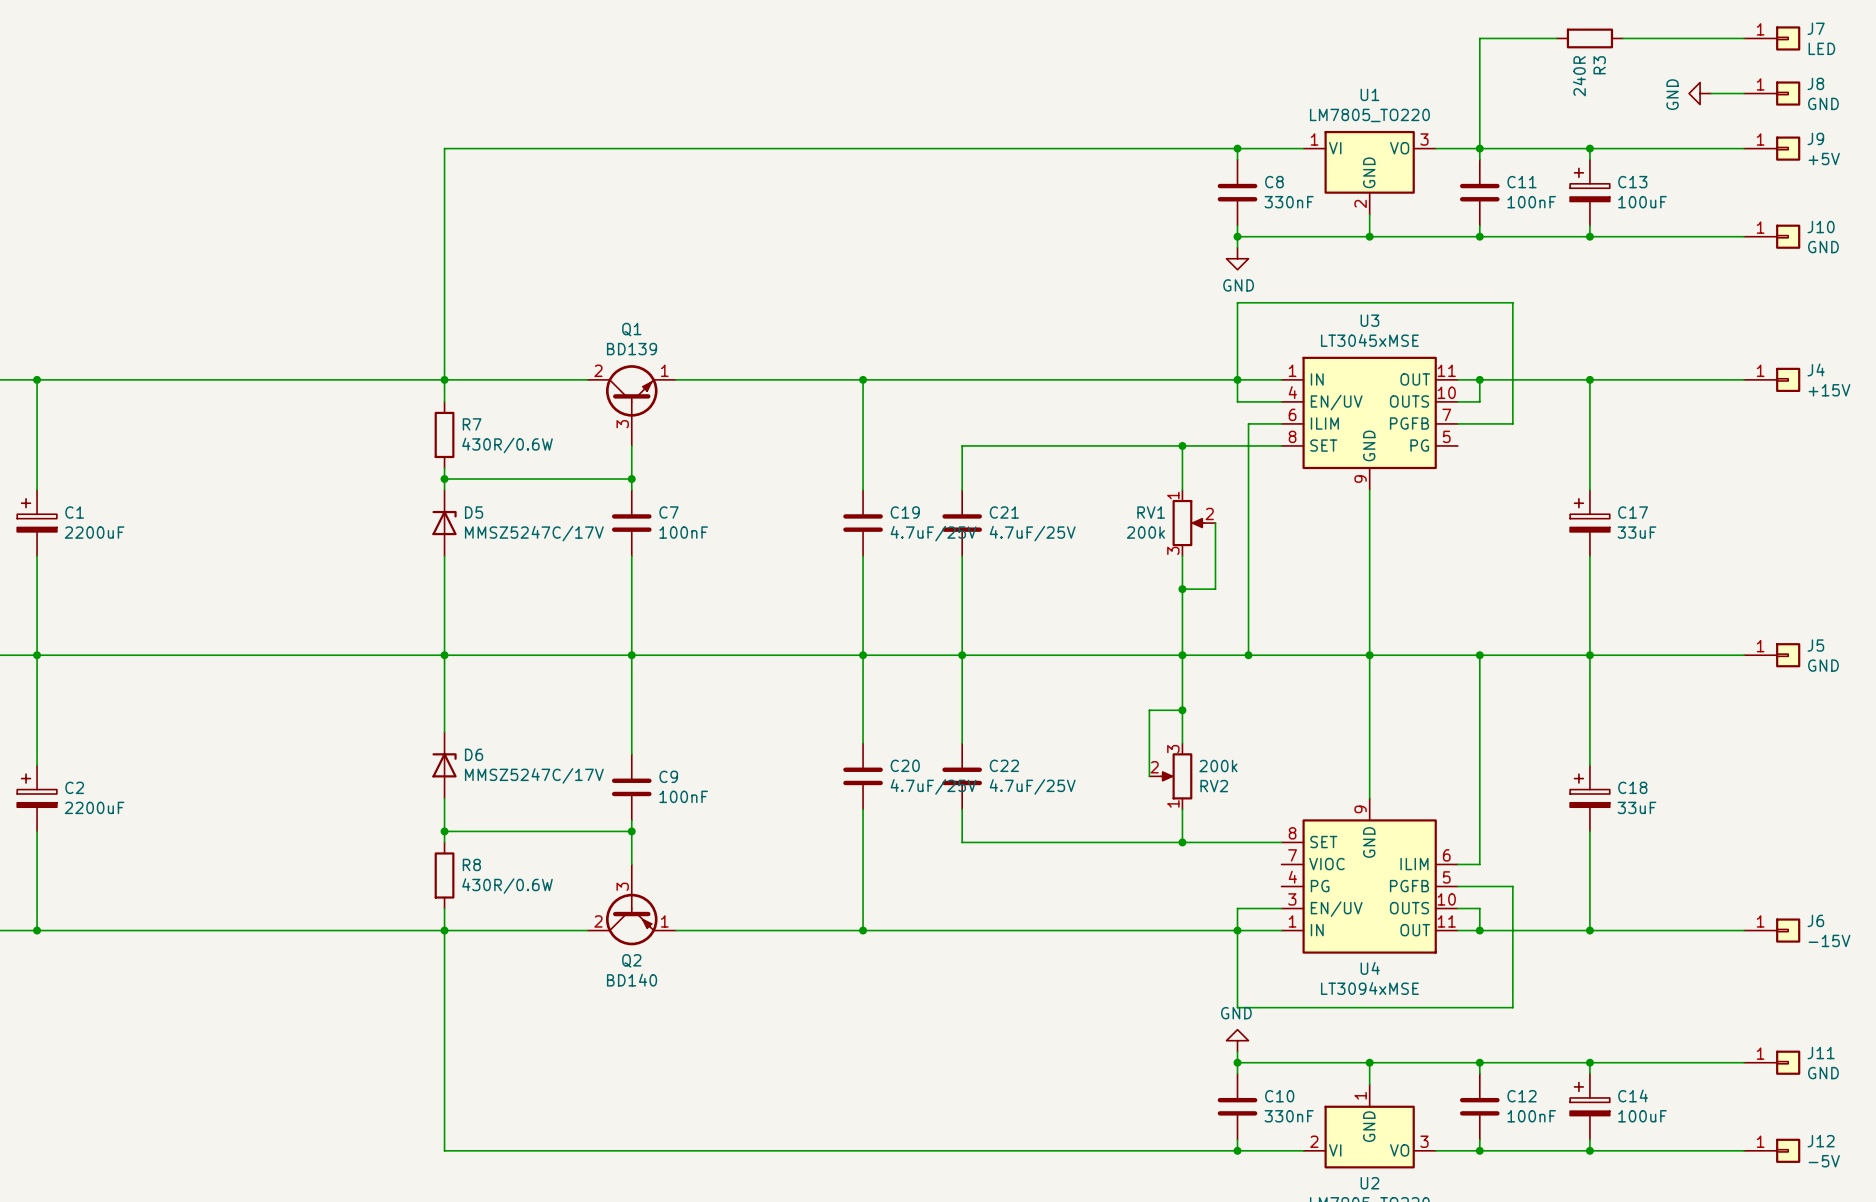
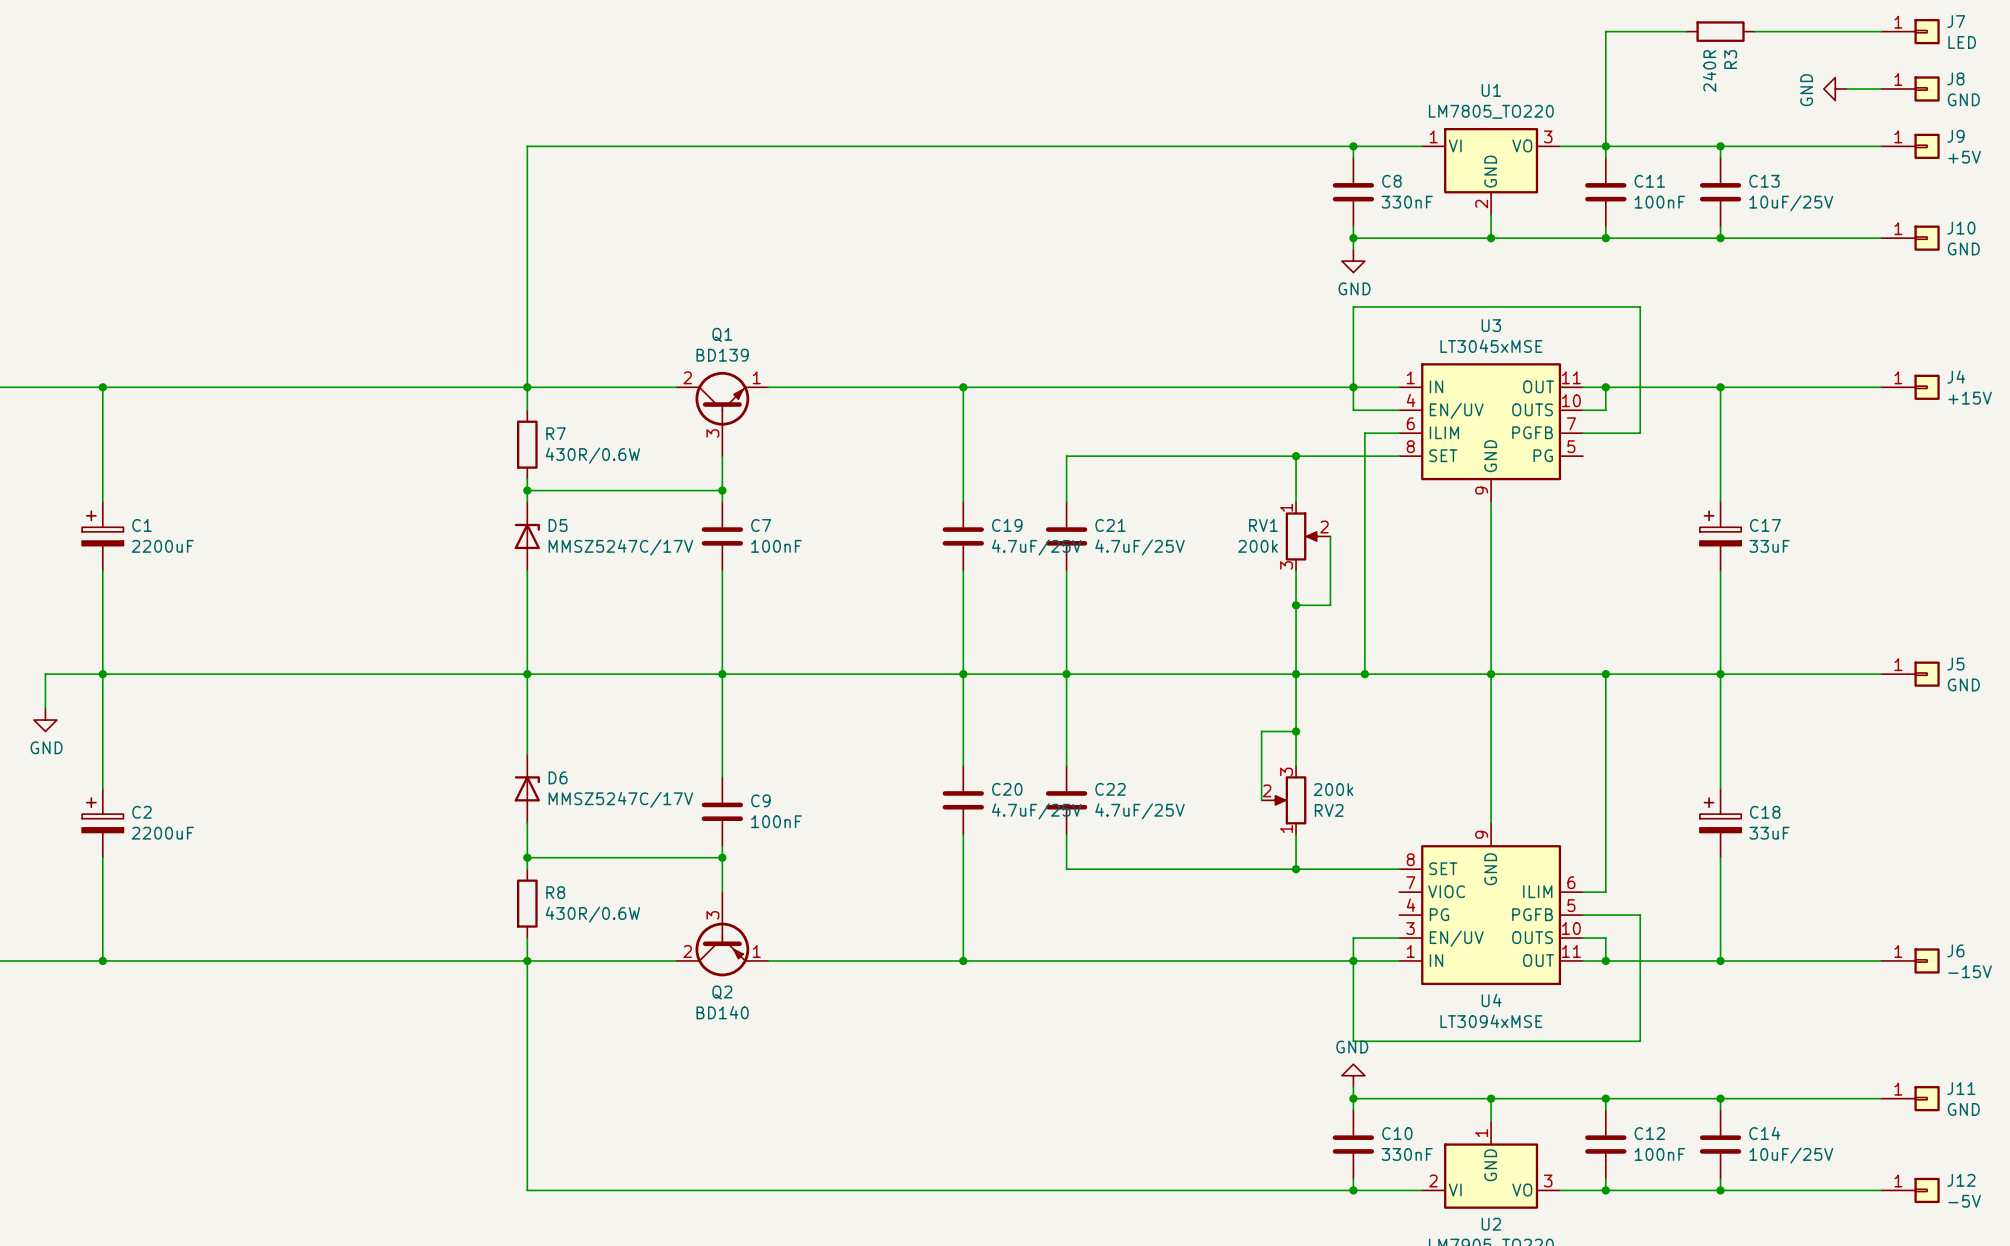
C13 symbol: [1570, 159, 1610, 226] -> [1699, 157, 1742, 227]
C13 value: 100uF (1642, 202) -> 10uF/25V (1791, 203)
C14 symbol: [1570, 1073, 1610, 1140] -> [1699, 1110, 1742, 1179]
C14 value: 100uF (1642, 1116) -> 10uF/25V (1791, 1155)

